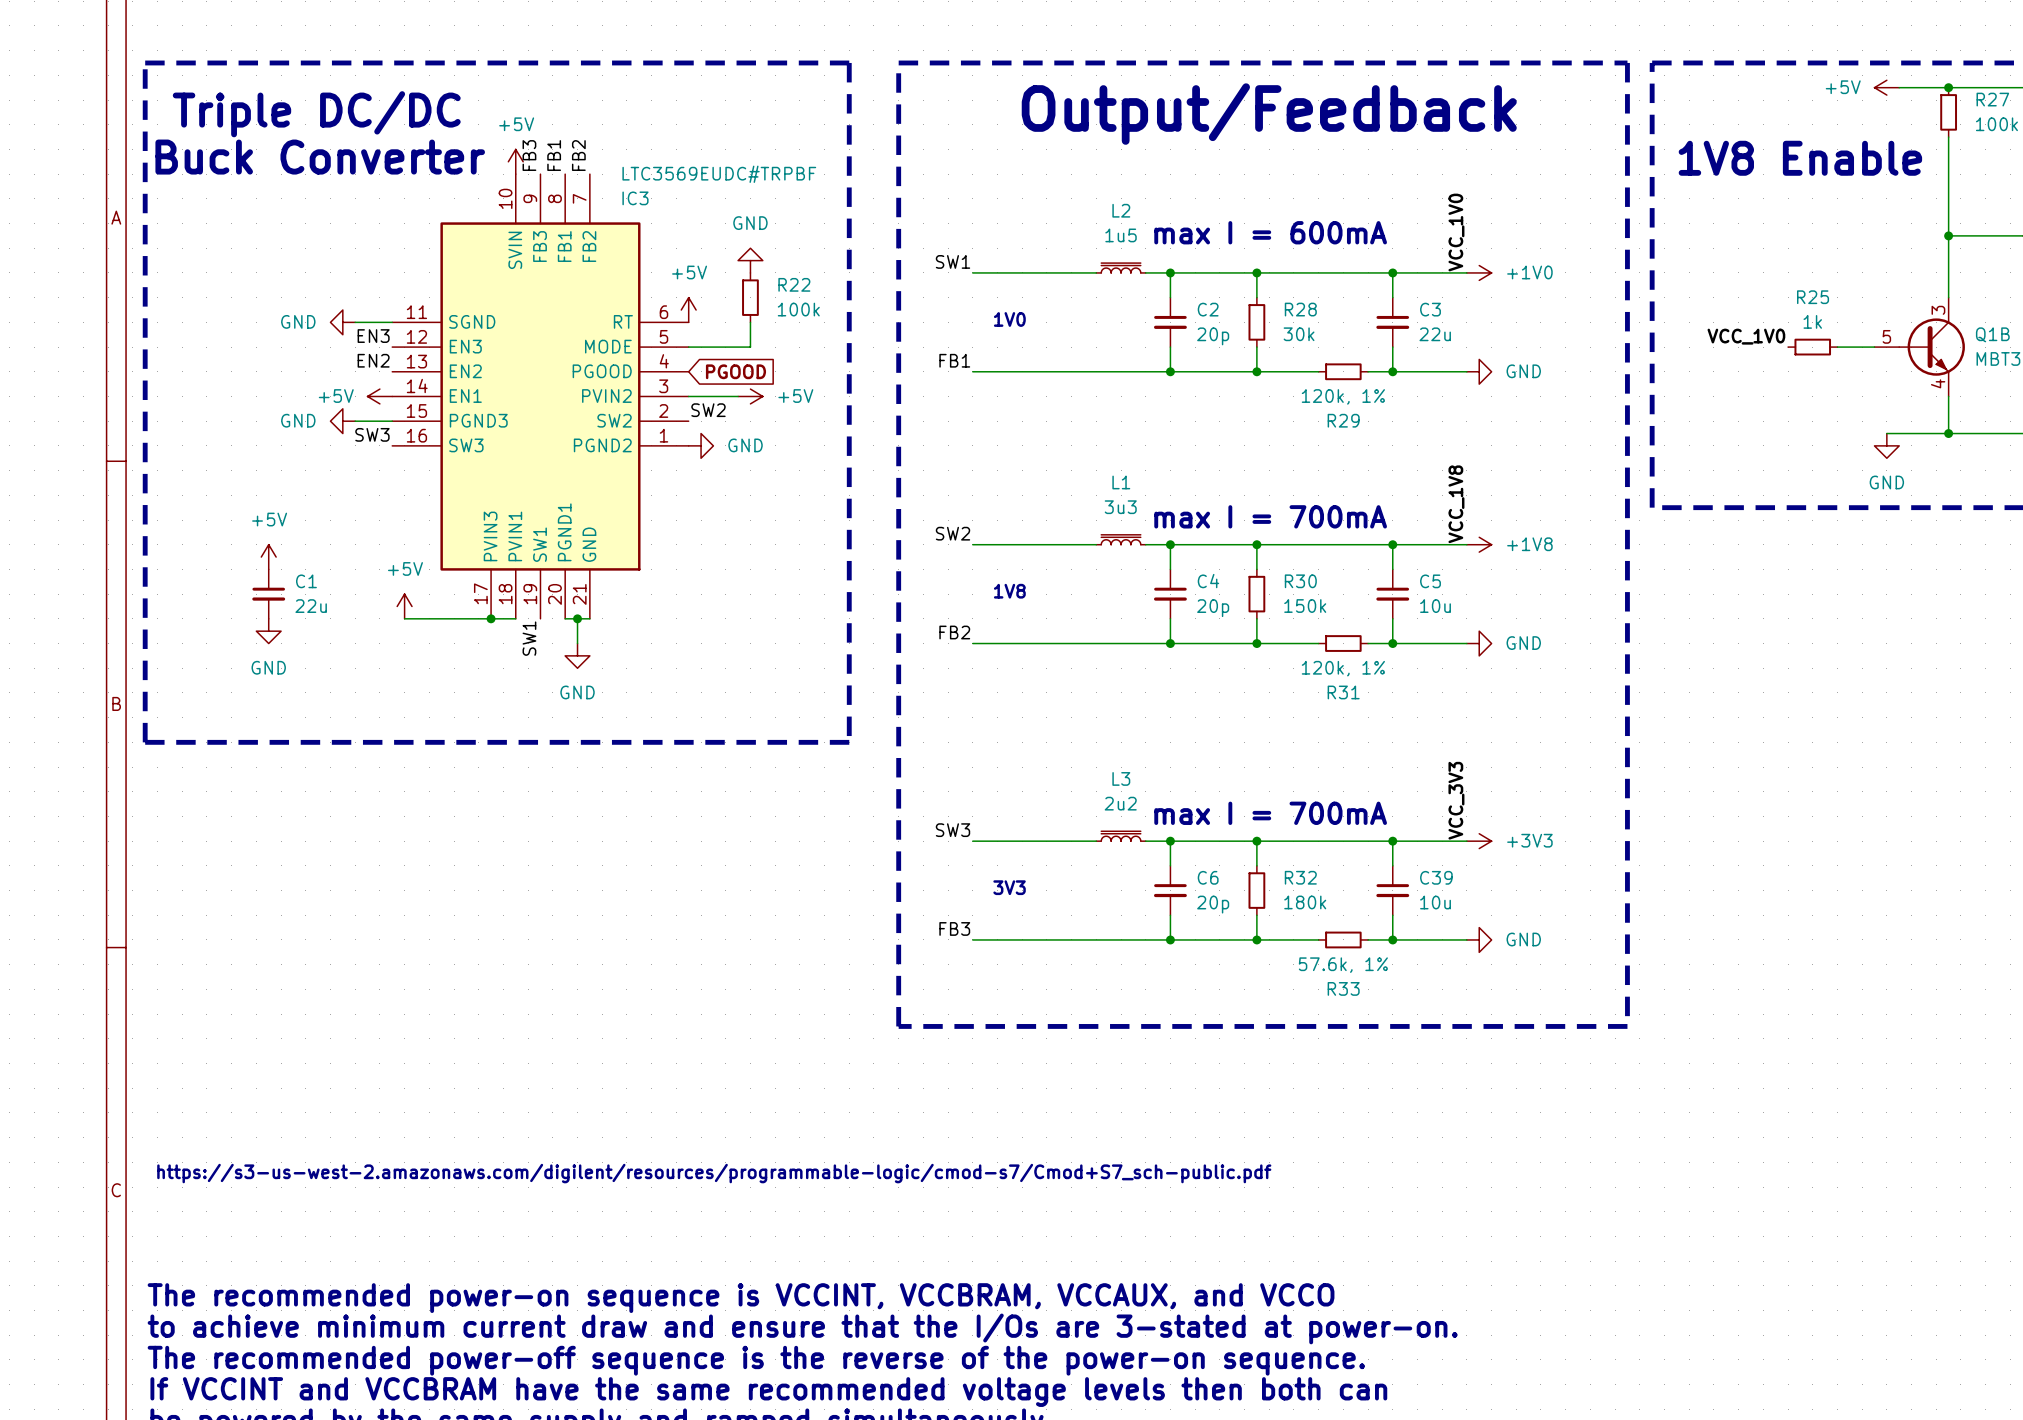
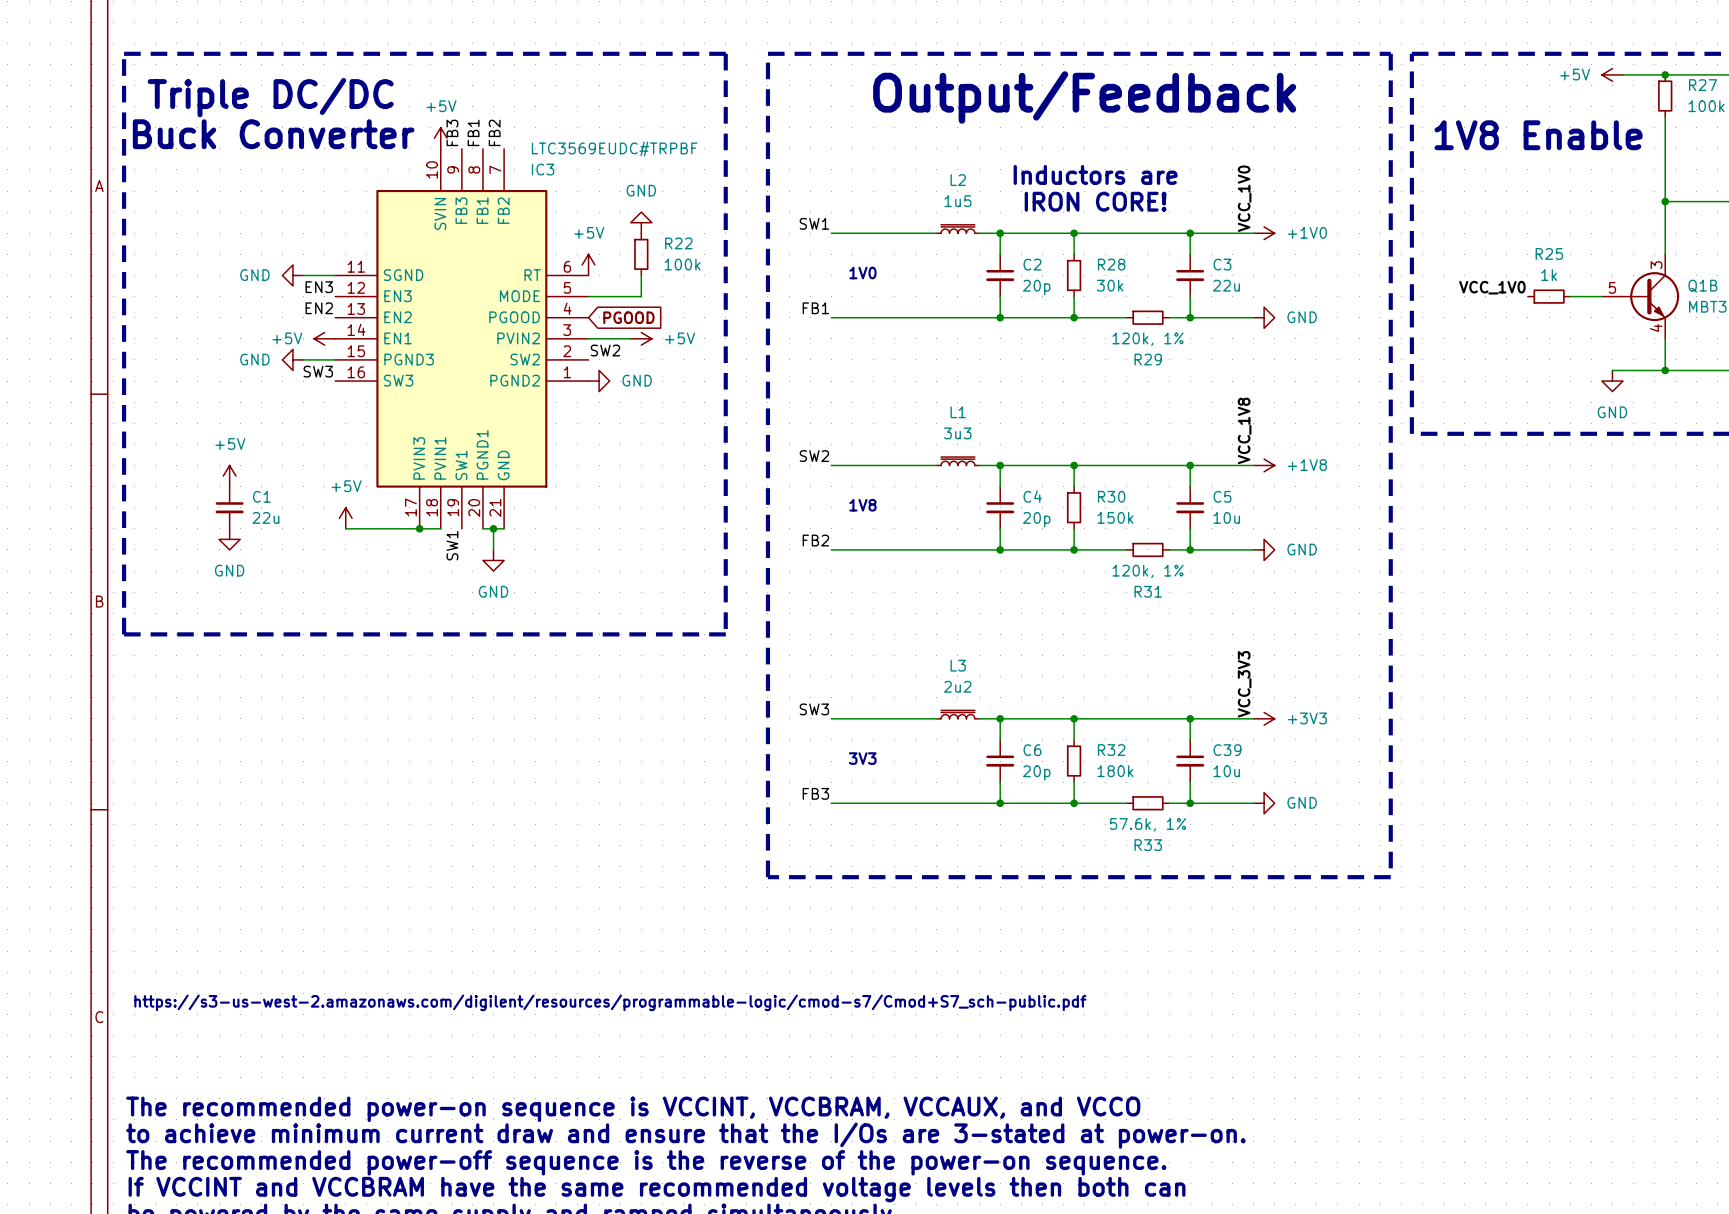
text: none -> Inductors are (1095, 174)
text: max I = 600mA (1270, 232) -> none
text: none -> IRON CORE! (1095, 201)
text: max I = 700mA (1270, 516) -> none
text: max I = 700mA (1270, 813) -> none

